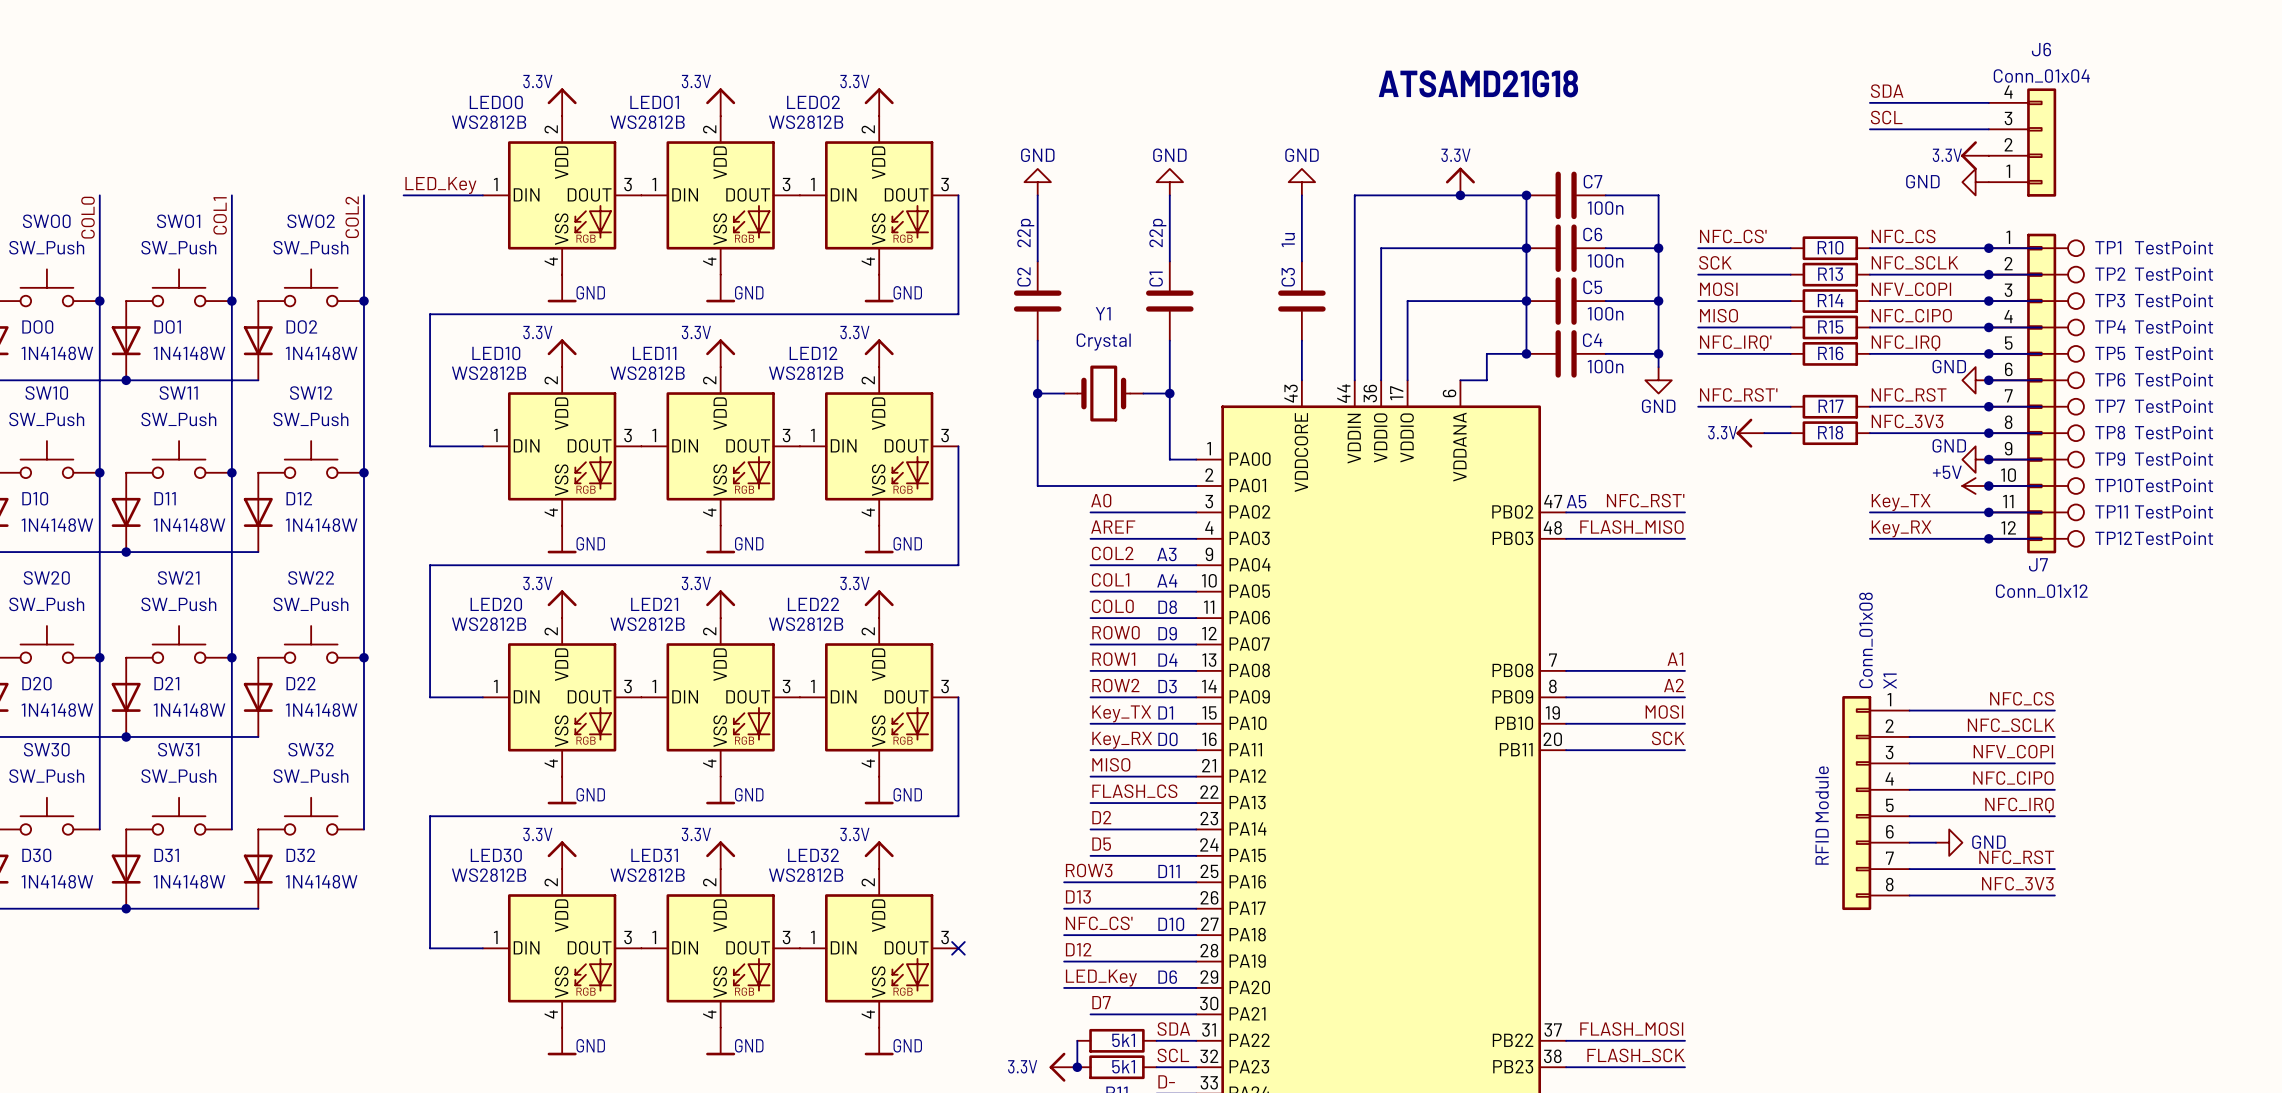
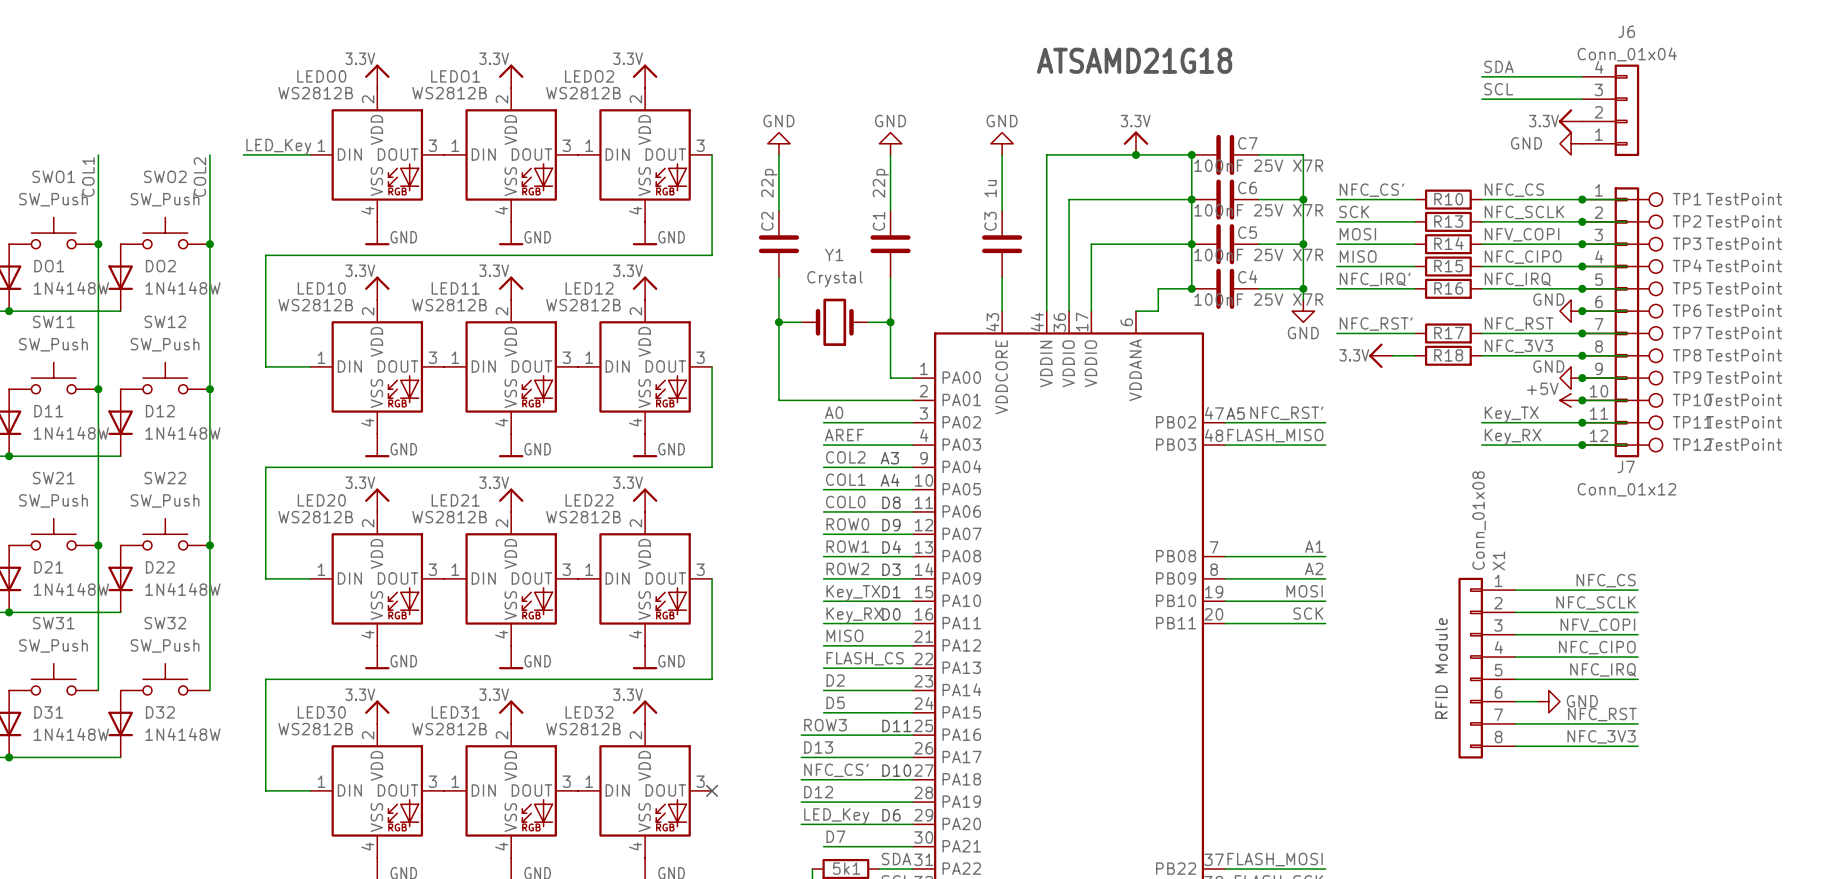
C7 value: 100n (1605, 208) -> 100nF 25V X7R (1258, 165)
C6 value: 100n (1605, 260) -> 100nF 25V X7R (1258, 210)
C5 value: 100n (1605, 313) -> 100nF 25V X7R (1258, 254)
C4 value: 100n (1605, 366) -> 100nF 25V X7R (1258, 299)

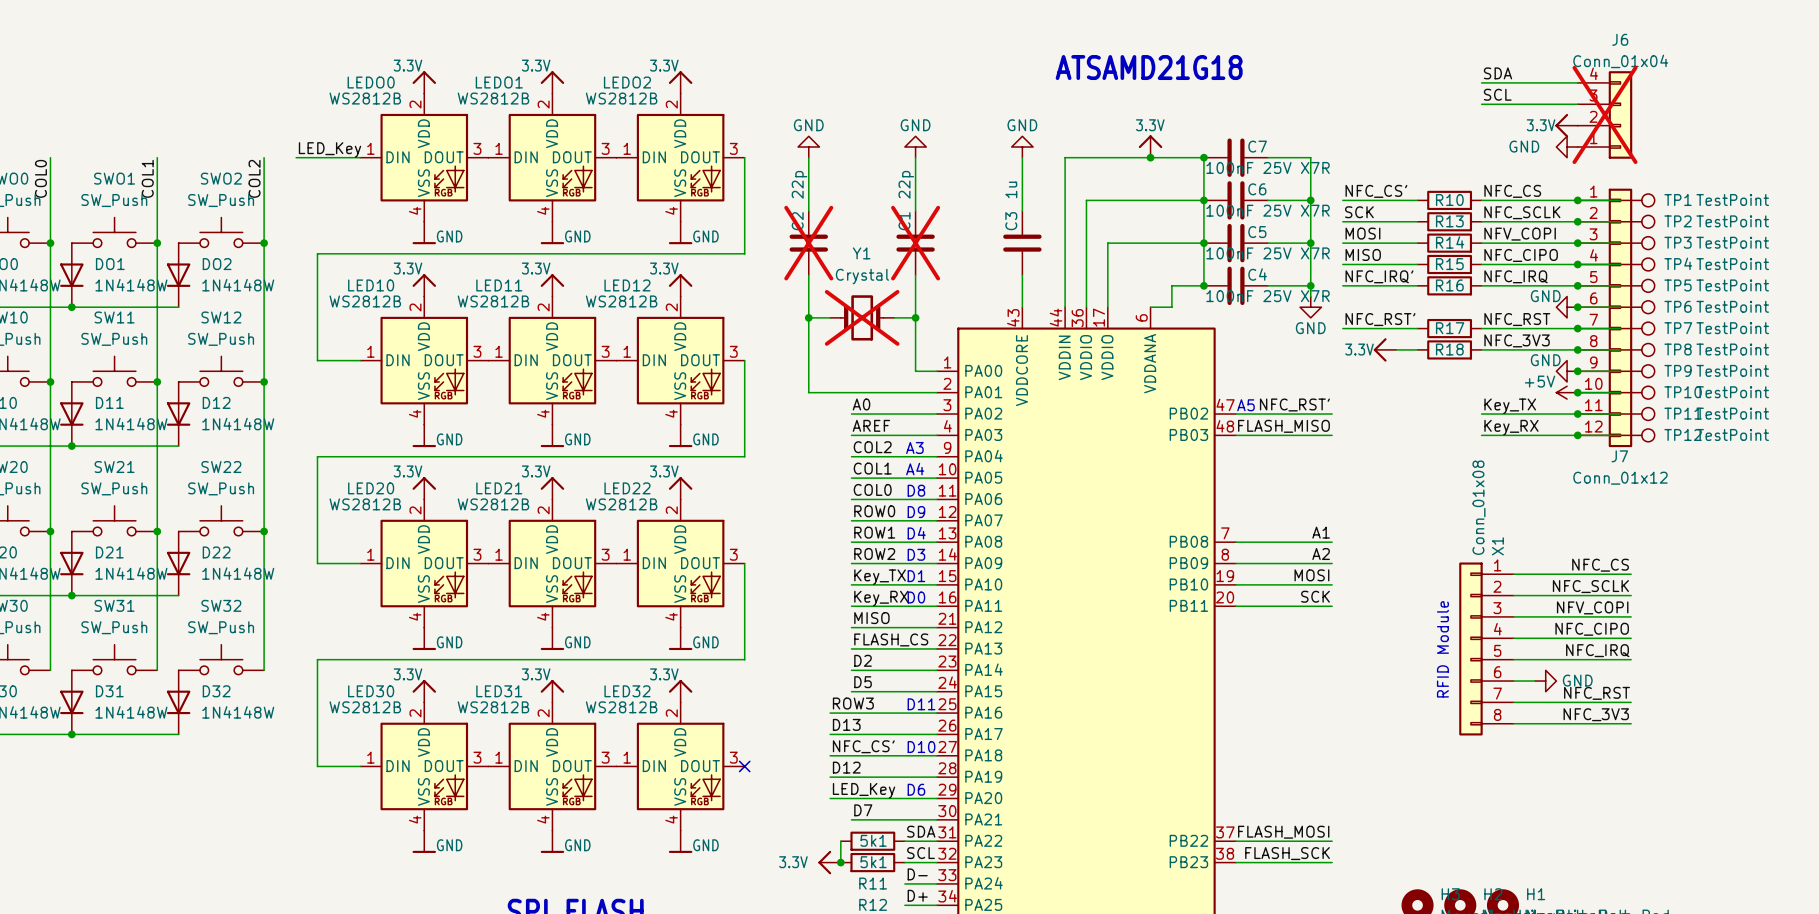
J6 do-not-place cross: none -> (1604, 114)
C2 do-not-place cross: none -> (808, 243)
C1 do-not-place cross: none -> (915, 243)
Y1 do-not-place cross: none -> (862, 317)

